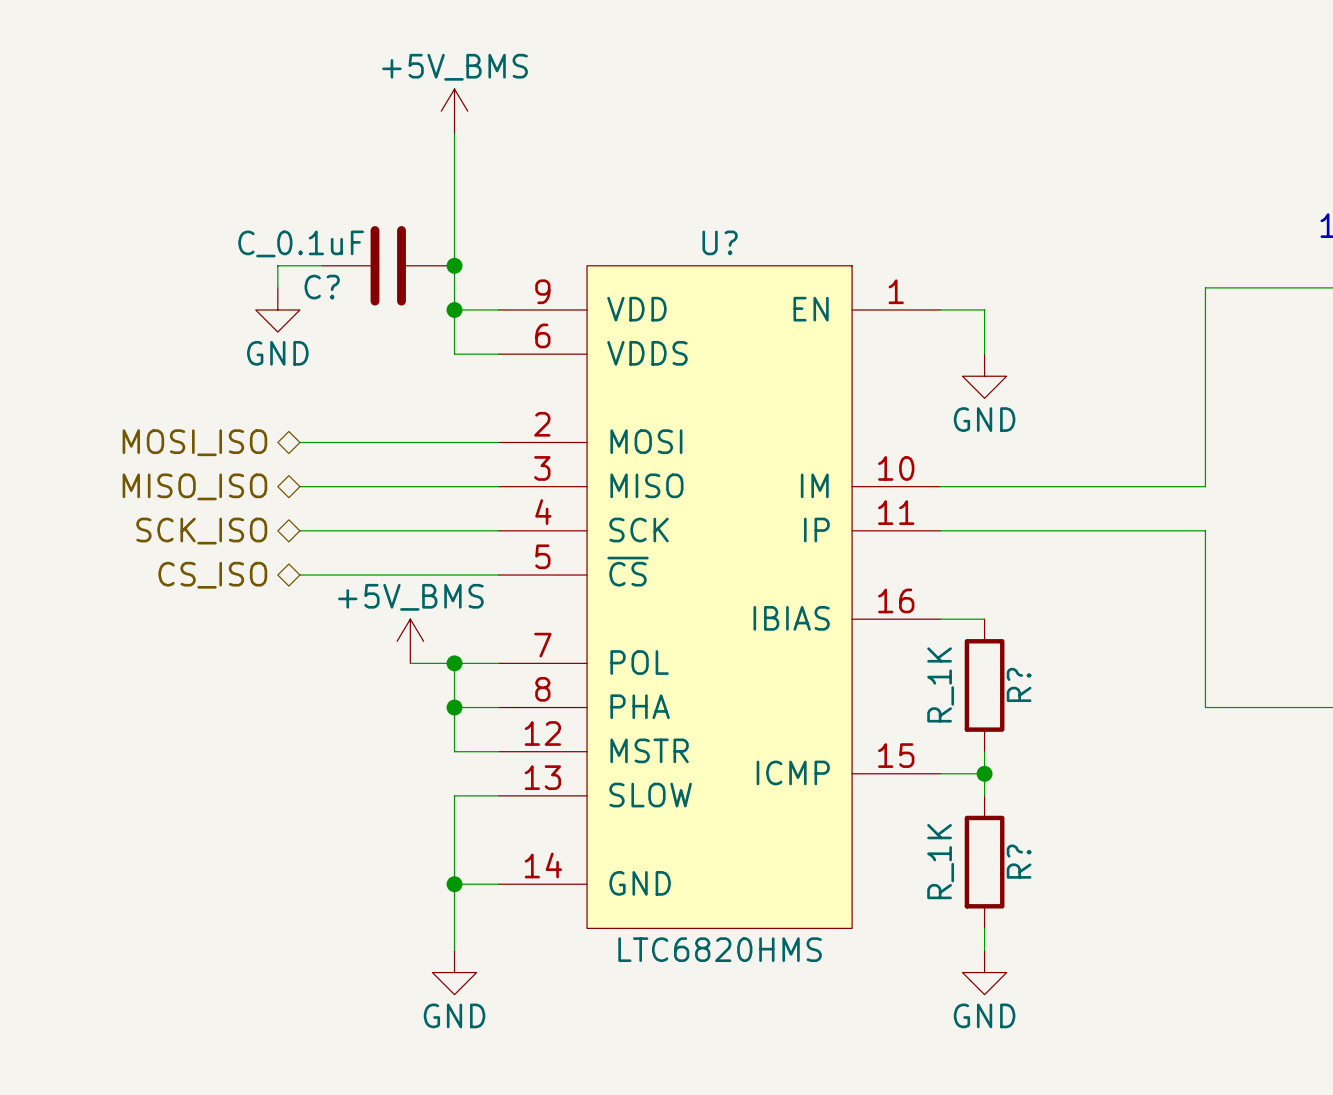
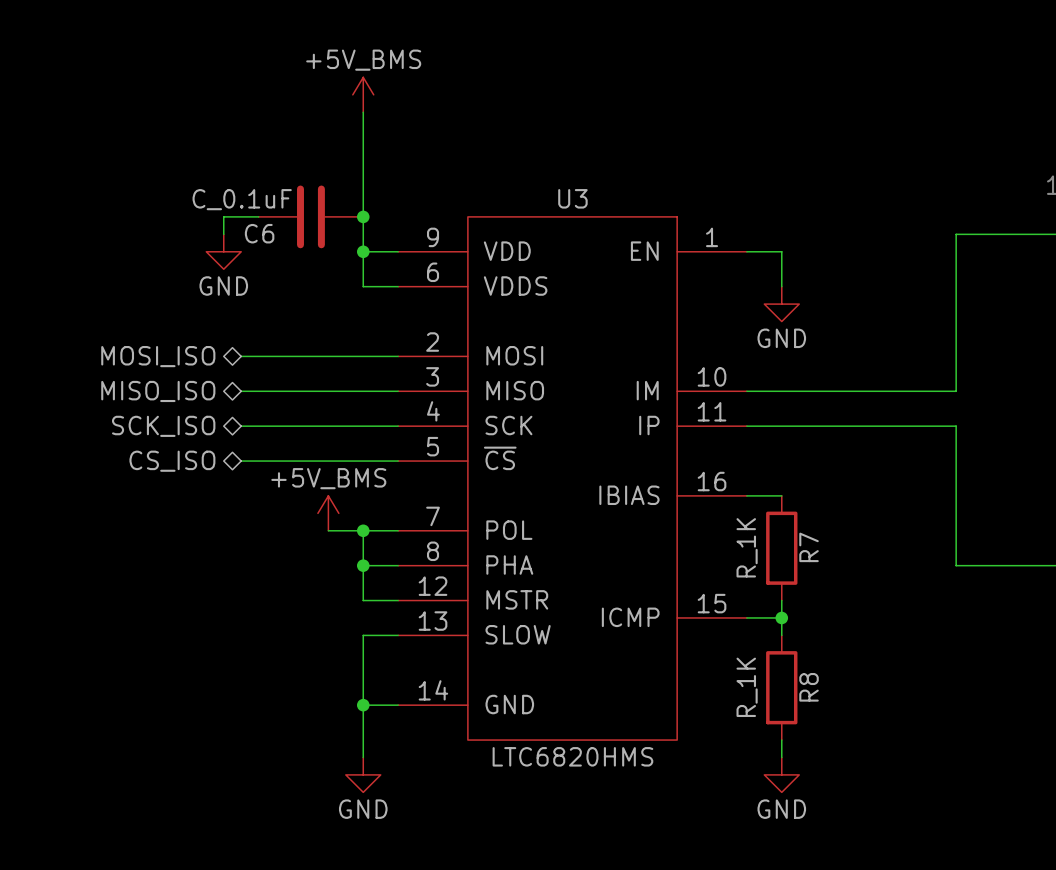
U? name: U? (720, 242) -> U3 (572, 198)
C? name: C? (322, 287) -> C6 (259, 233)
R? name: R? (1019, 684) -> R7 (809, 547)
R? name: R? (1019, 861) -> R8 (809, 687)

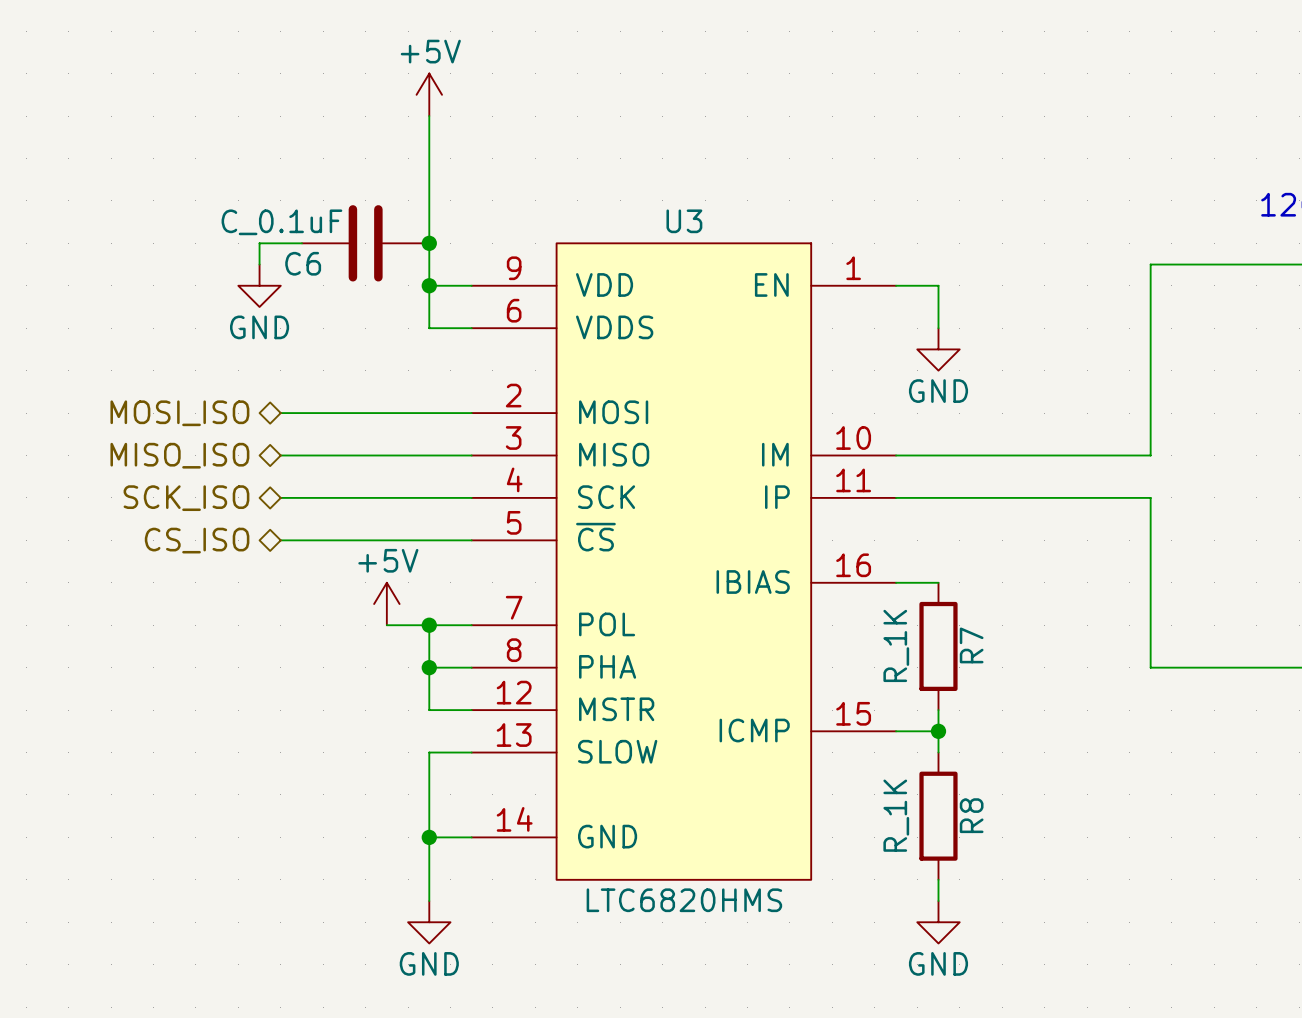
power symbol: +5V_BMS (363, 94) -> +5V (429, 94)
power symbol: +5V_BMS (328, 513) -> +5V (386, 604)

